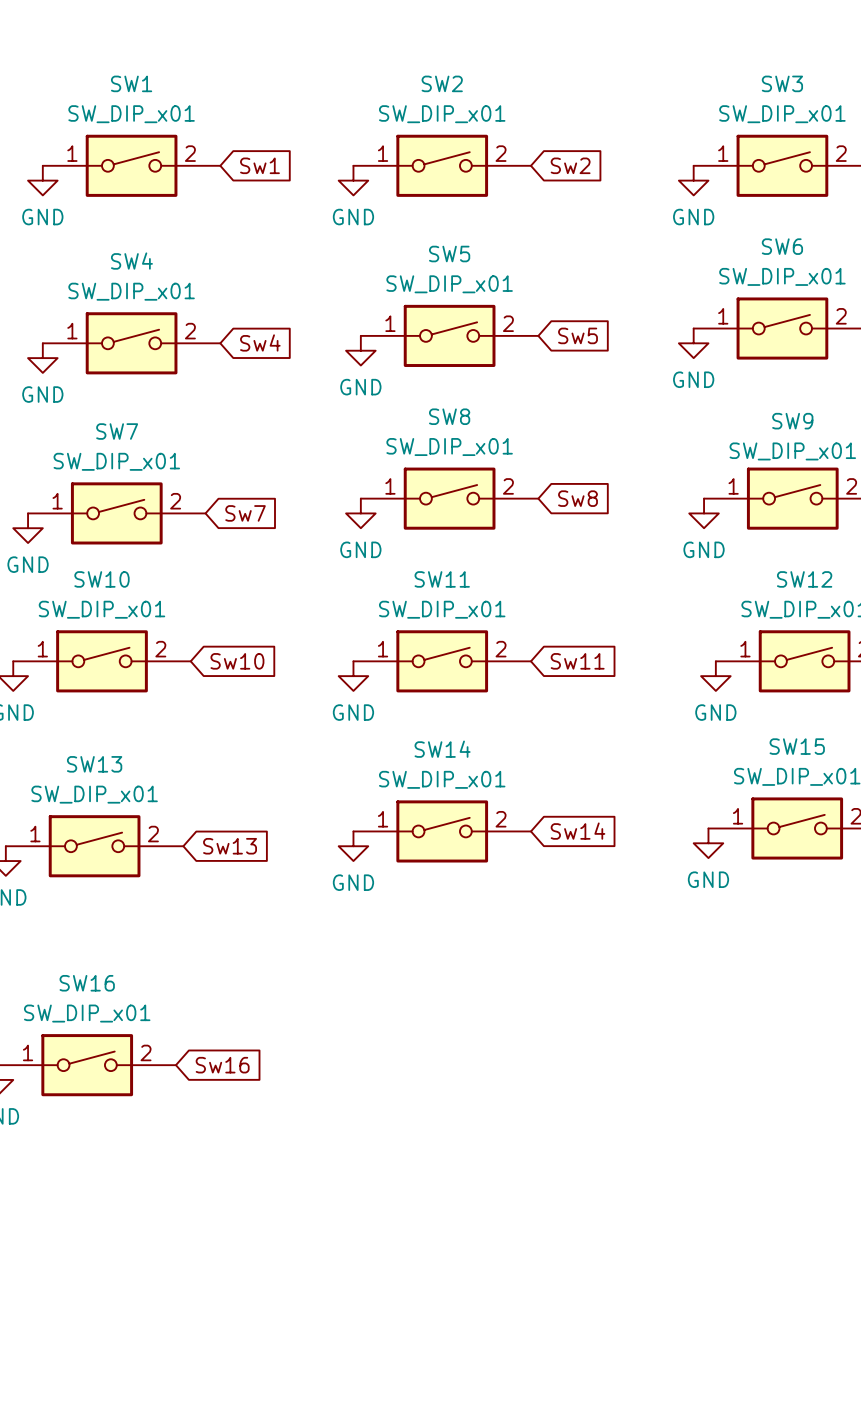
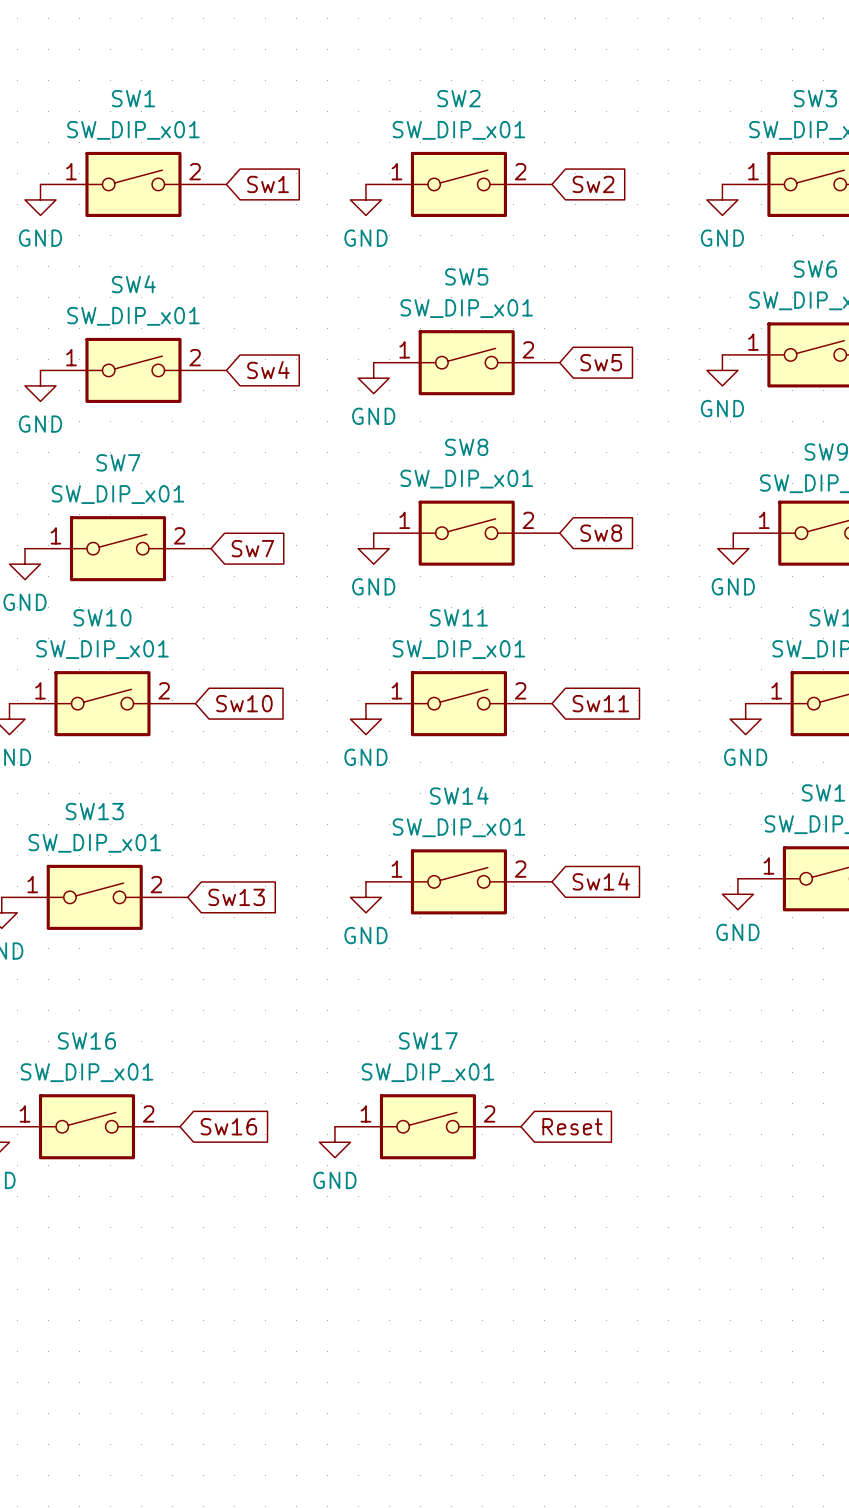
SW17: none -> SW_DIP_x01 (427, 1126)
global label: none -> Reset (572, 1126)
power symbol: none -> GND (334, 1142)

